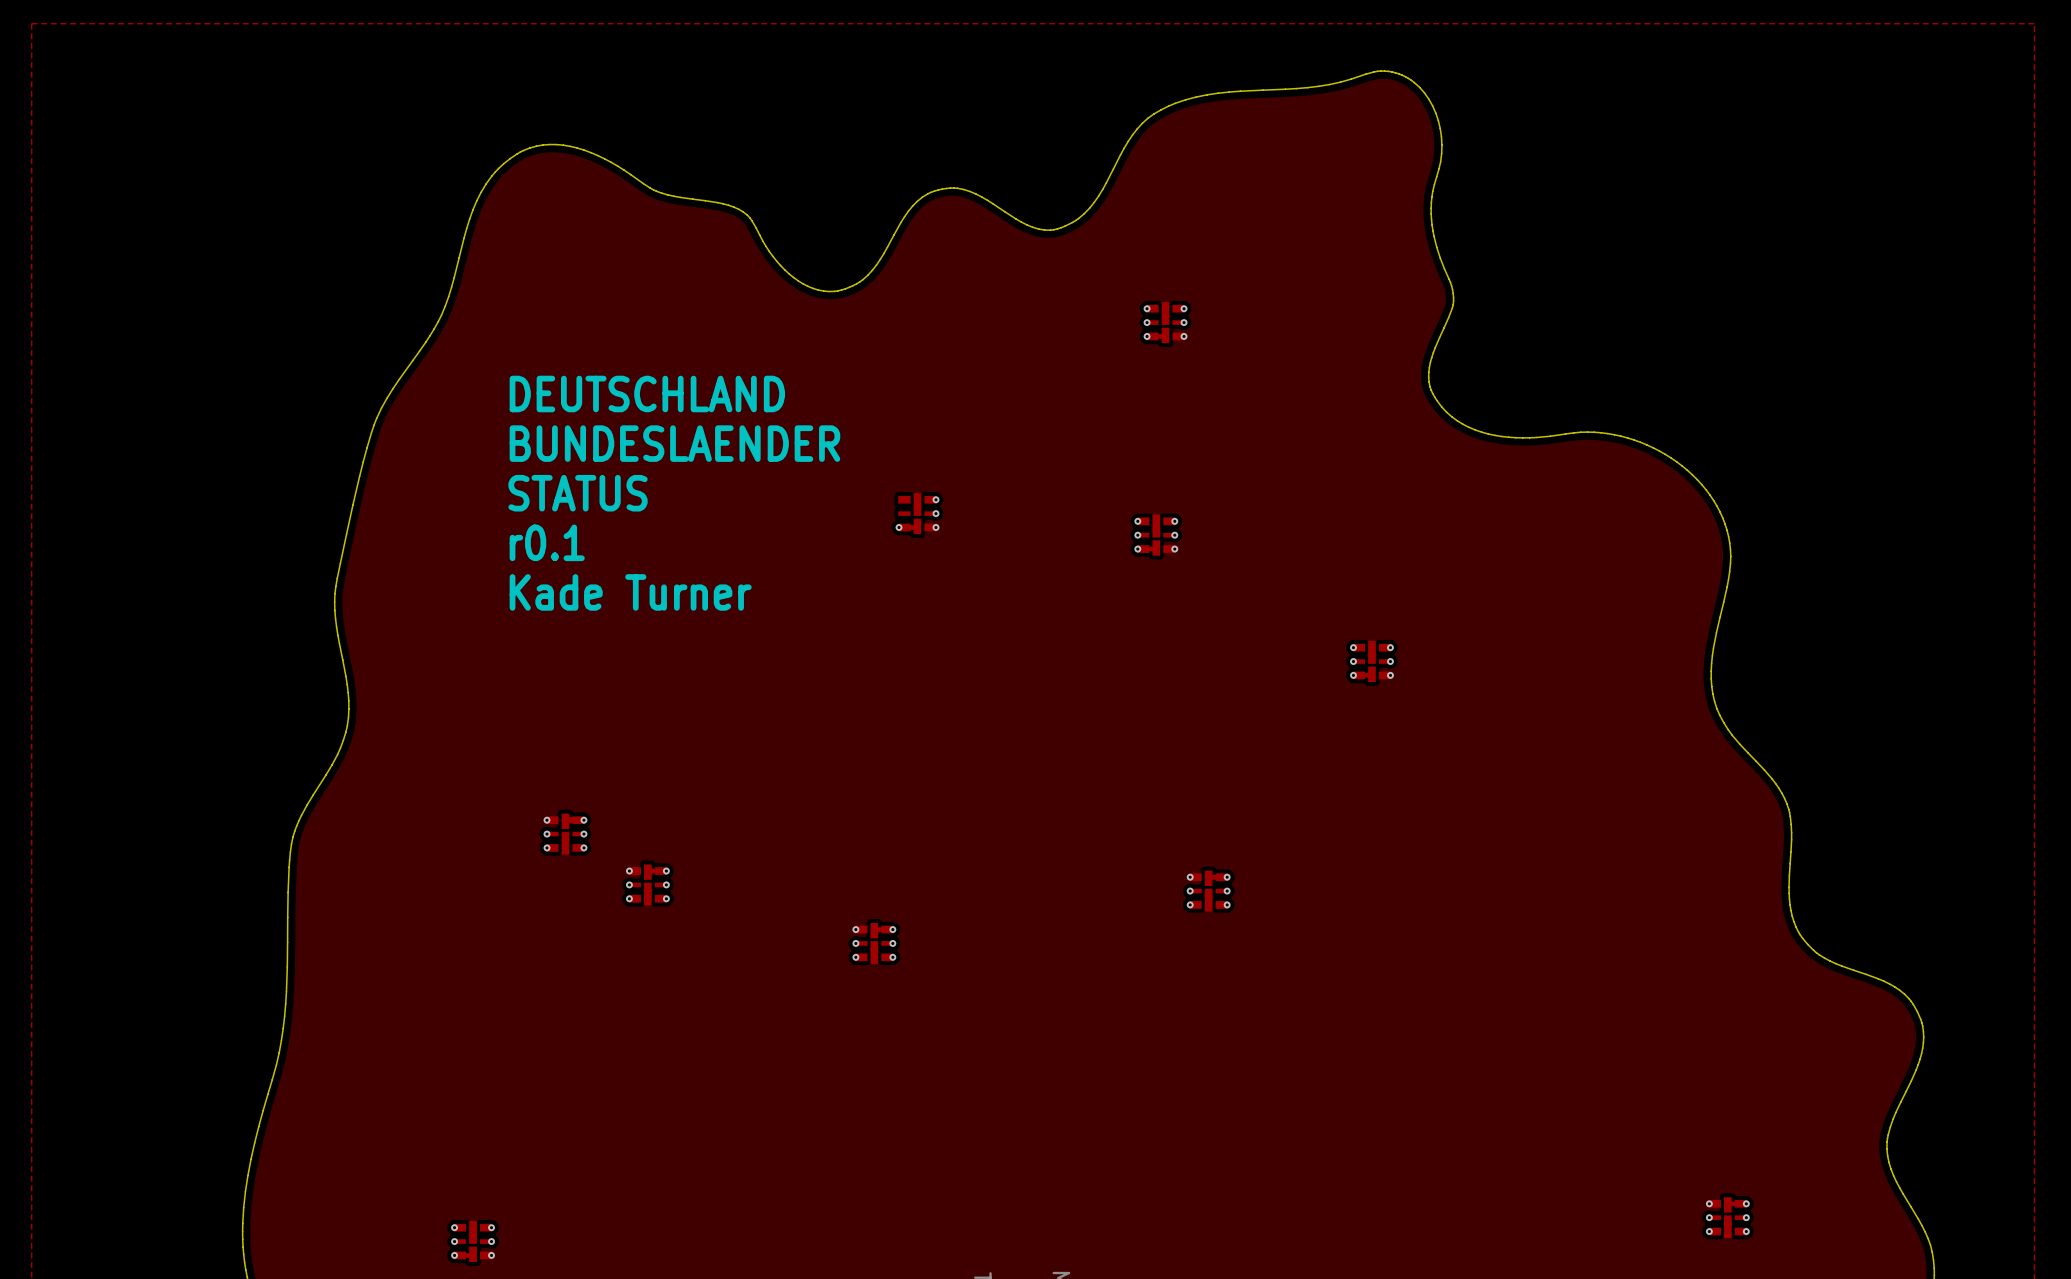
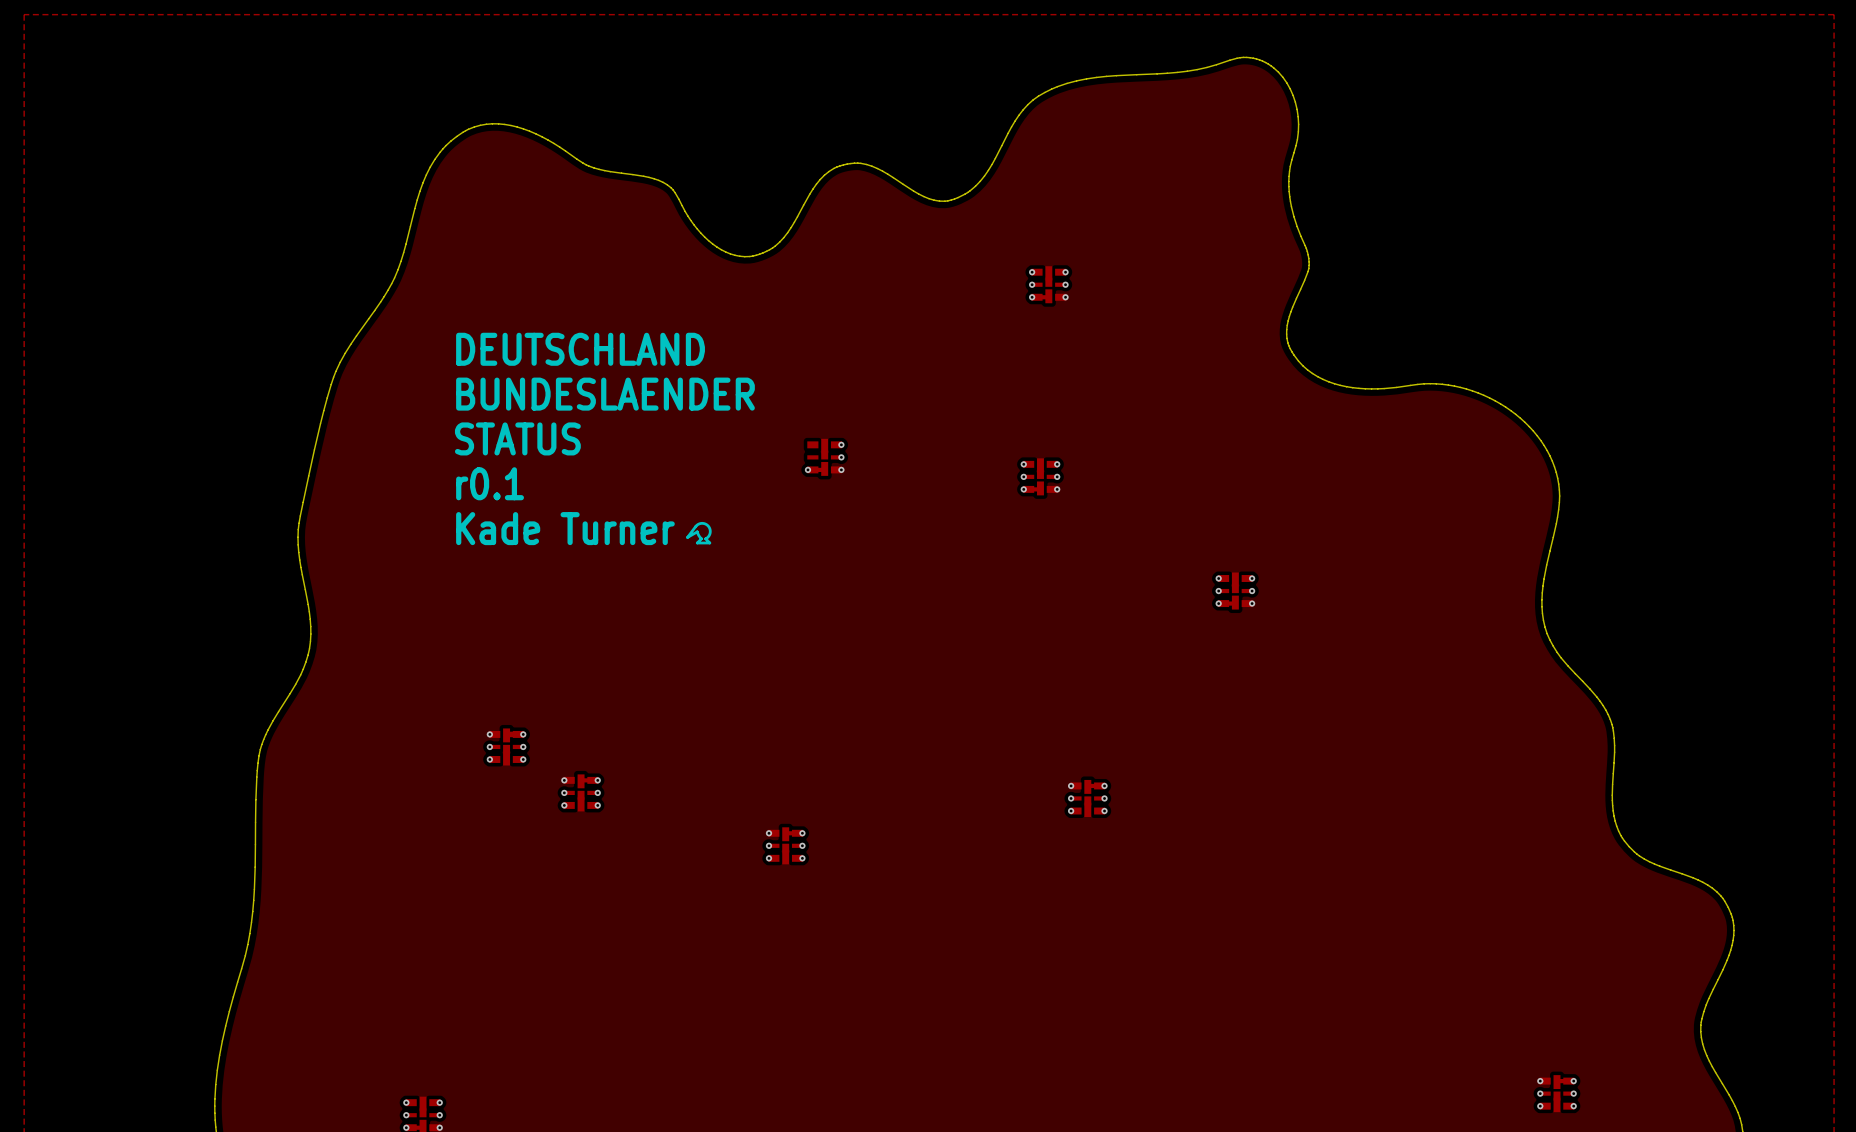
line: none -> (695, 526) (687, 537) (697, 531) (701, 538) (697, 543) (709, 543) (705, 538) (710, 533) (708, 526) (702, 523) (695, 526)

